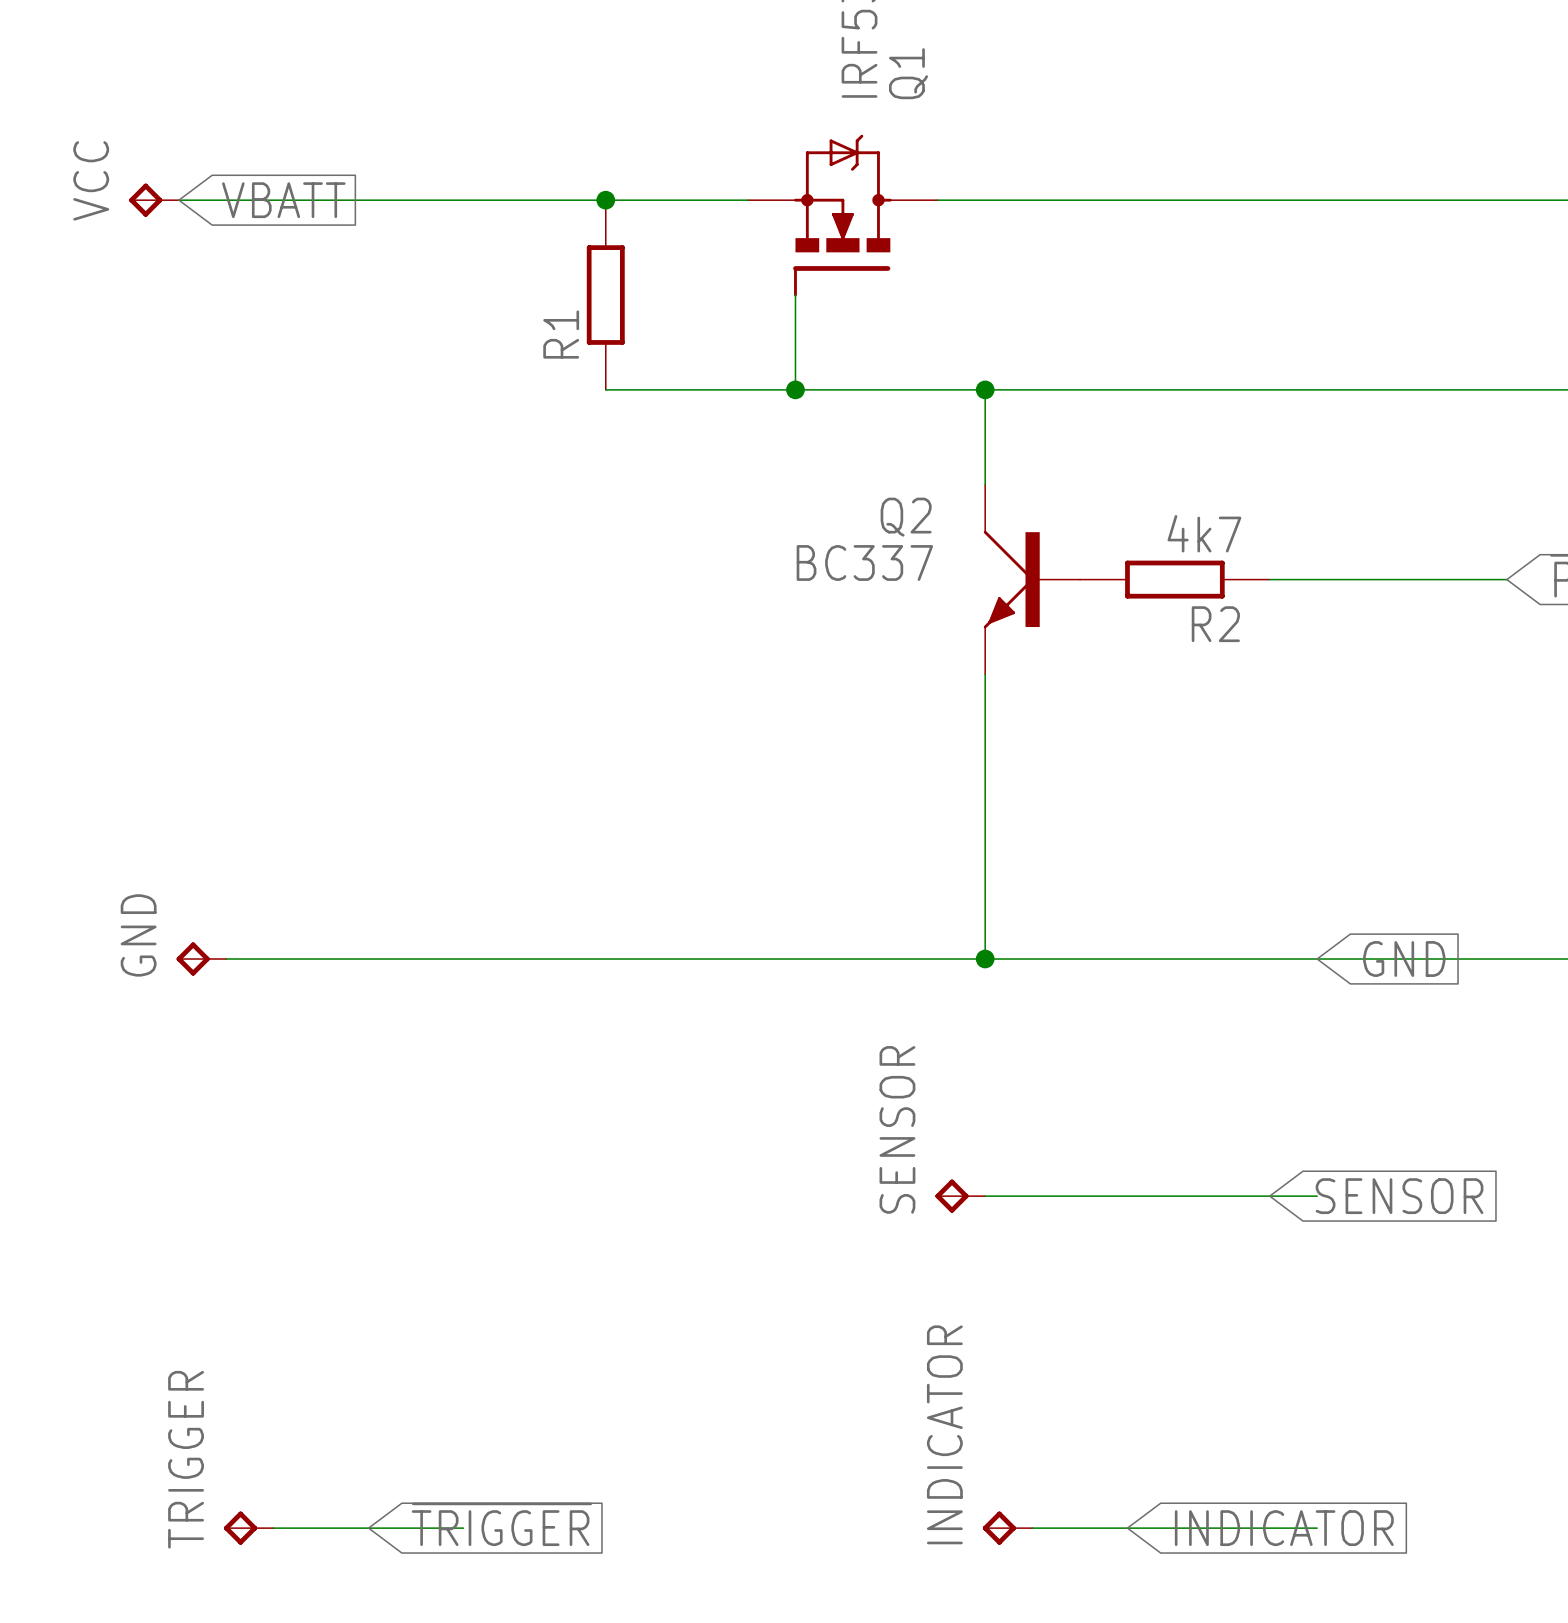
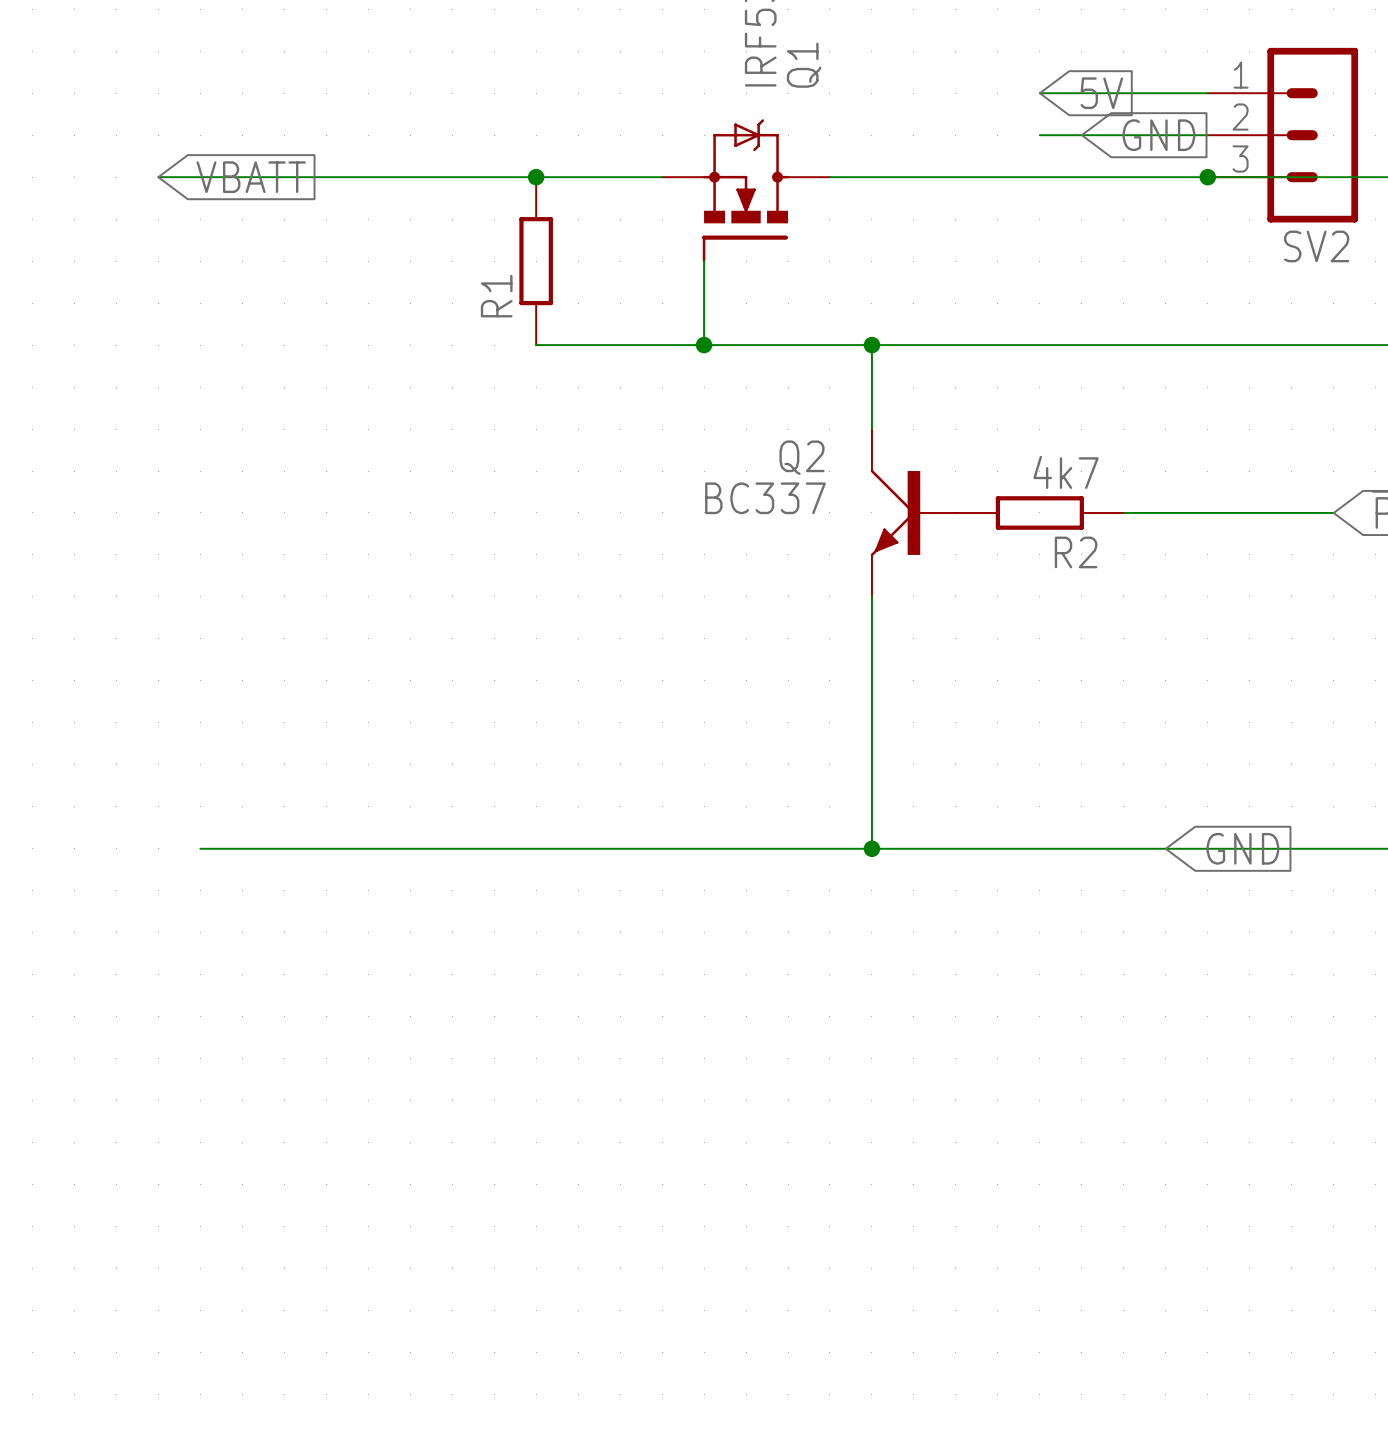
wire: none -> (1039, 93) (1207, 93)
global label: none -> 5V (1101, 93)
wire: none -> (1039, 135) (1207, 135)
global label: none -> GND (1158, 135)
SV2: none -> (1282, 135)
VCC: (154, 200) -> none
junction: none -> (1207, 177)
GND: (201, 959) -> none
SENSOR: (960, 1196) -> none
wire: (985, 1196) (1317, 1196) -> none
global label: SENSOR (1399, 1196) -> none
global label: ~{TRIGGER} (501, 1524) -> none
TRIGGER: (248, 1528) -> none
wire: (273, 1528) (463, 1528) -> none
INDICATOR: (1007, 1528) -> none
wire: (1032, 1528) (1317, 1528) -> none
global label: INDICATOR (1284, 1528) -> none

